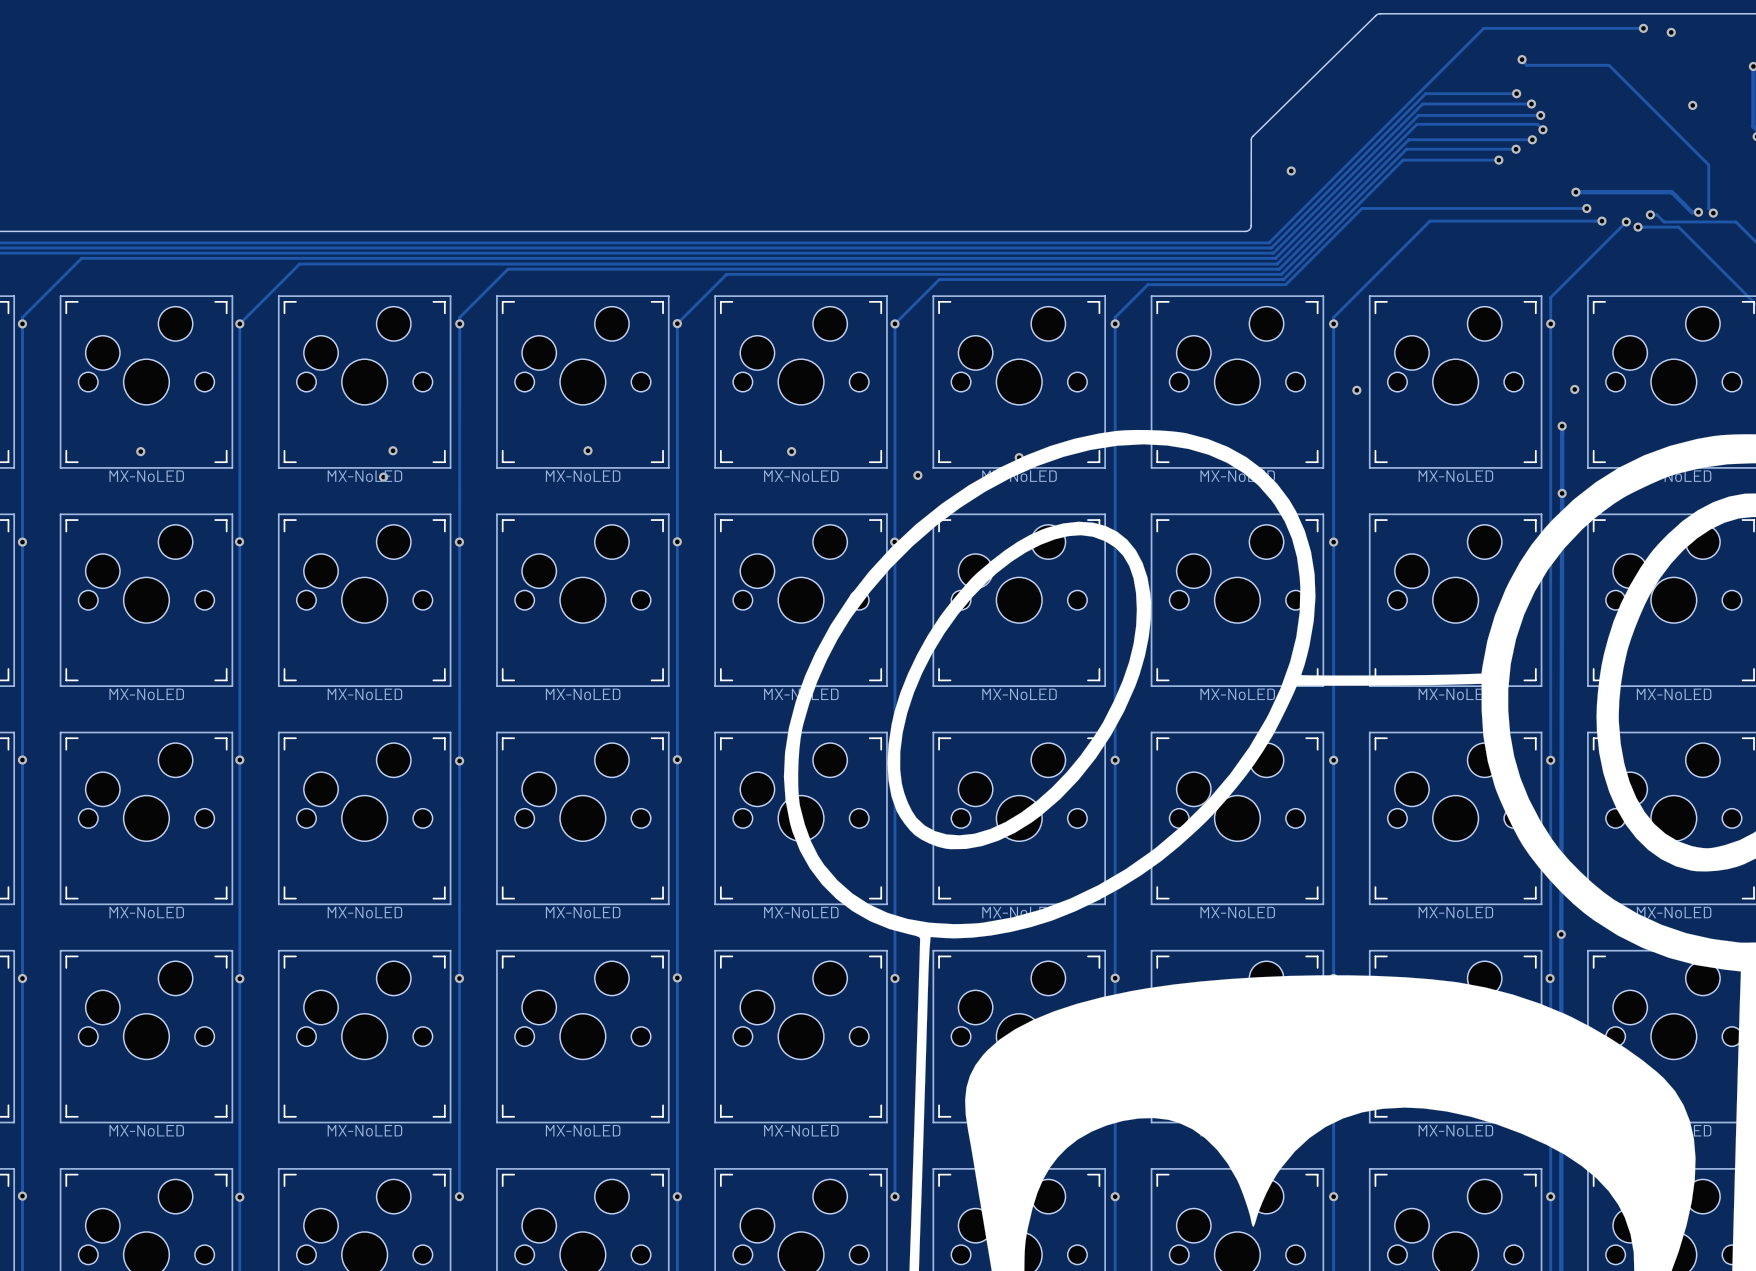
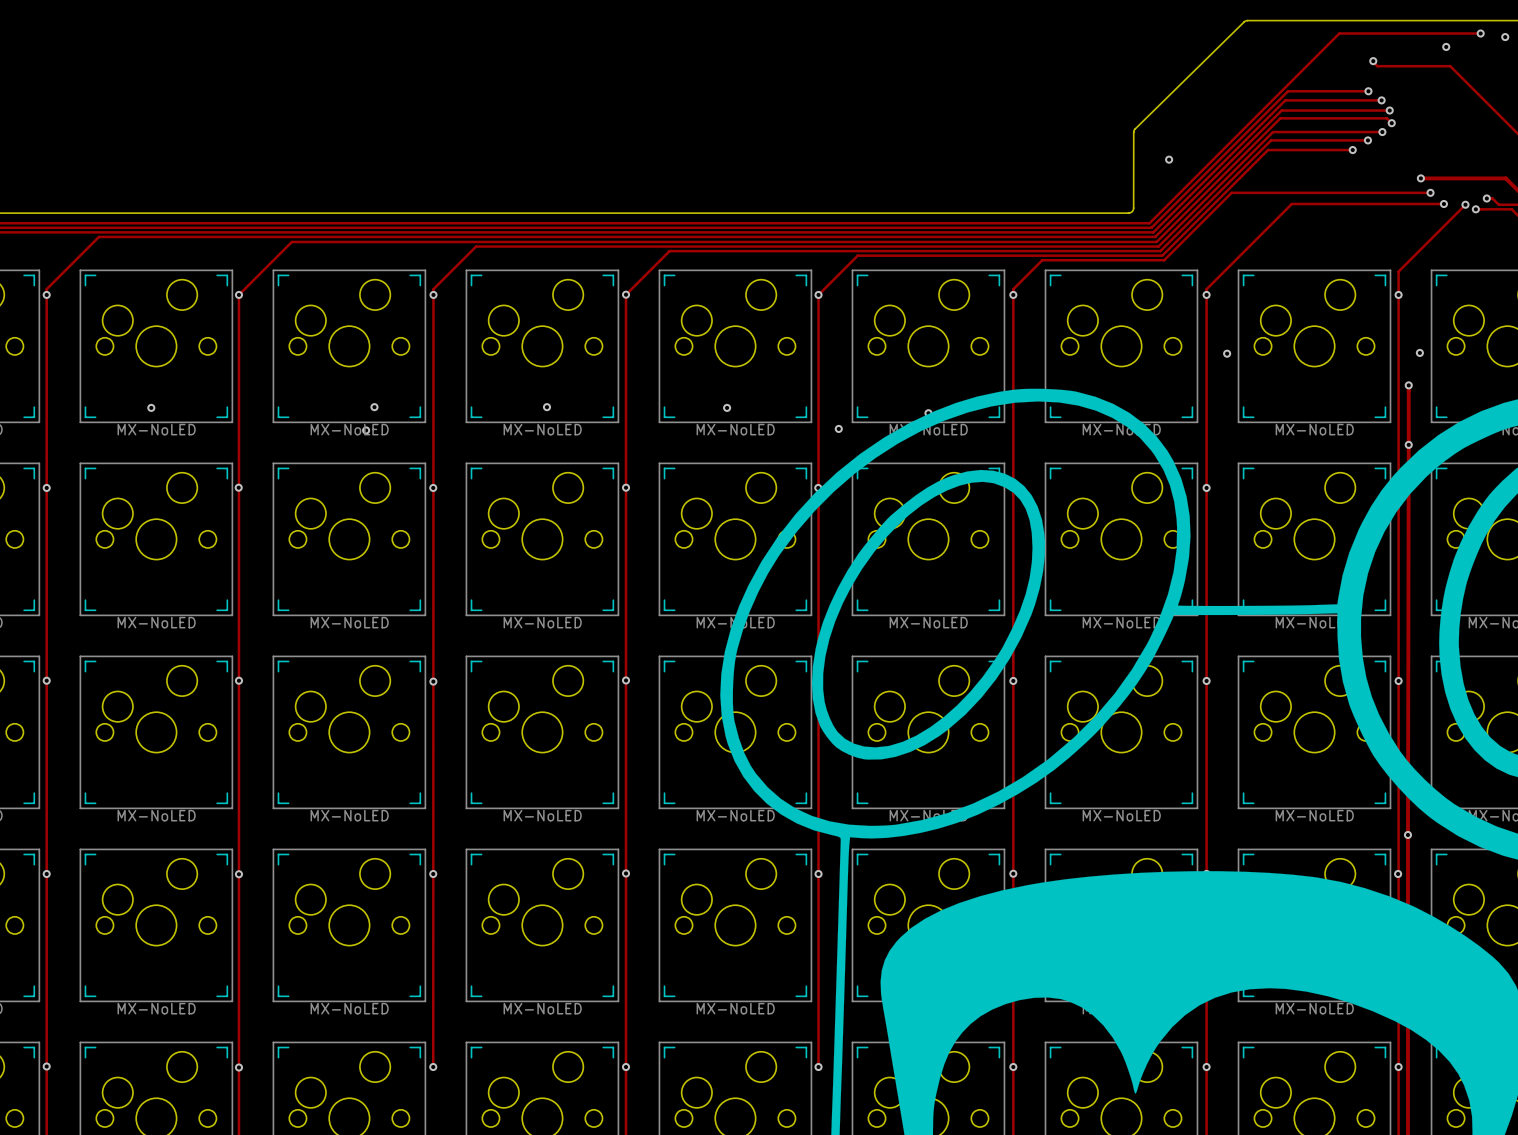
via: none -> (1446, 46)

